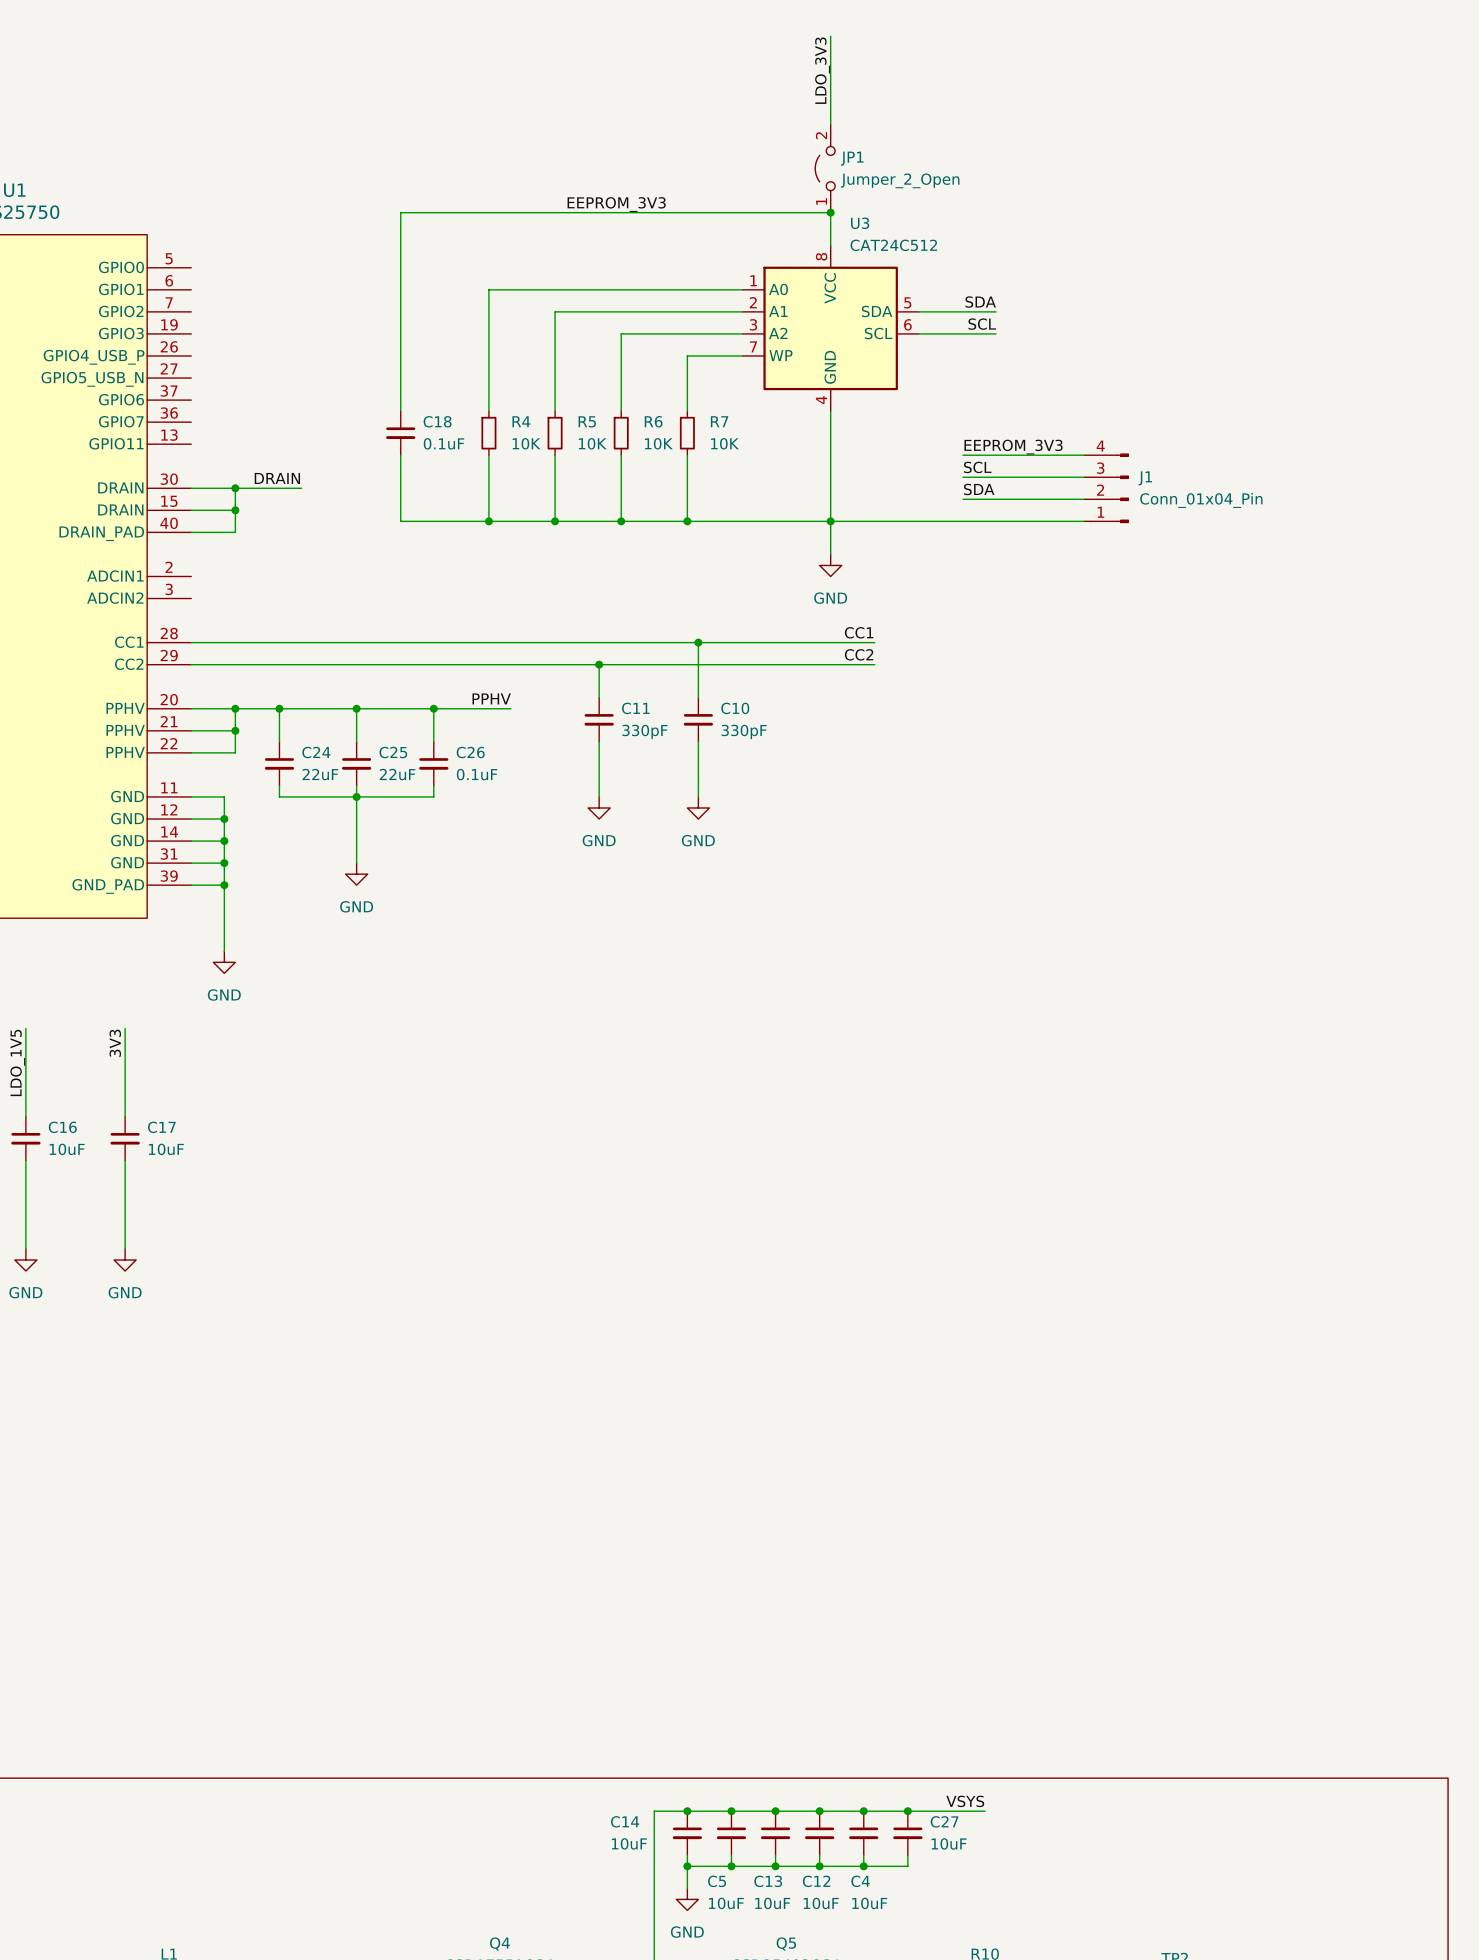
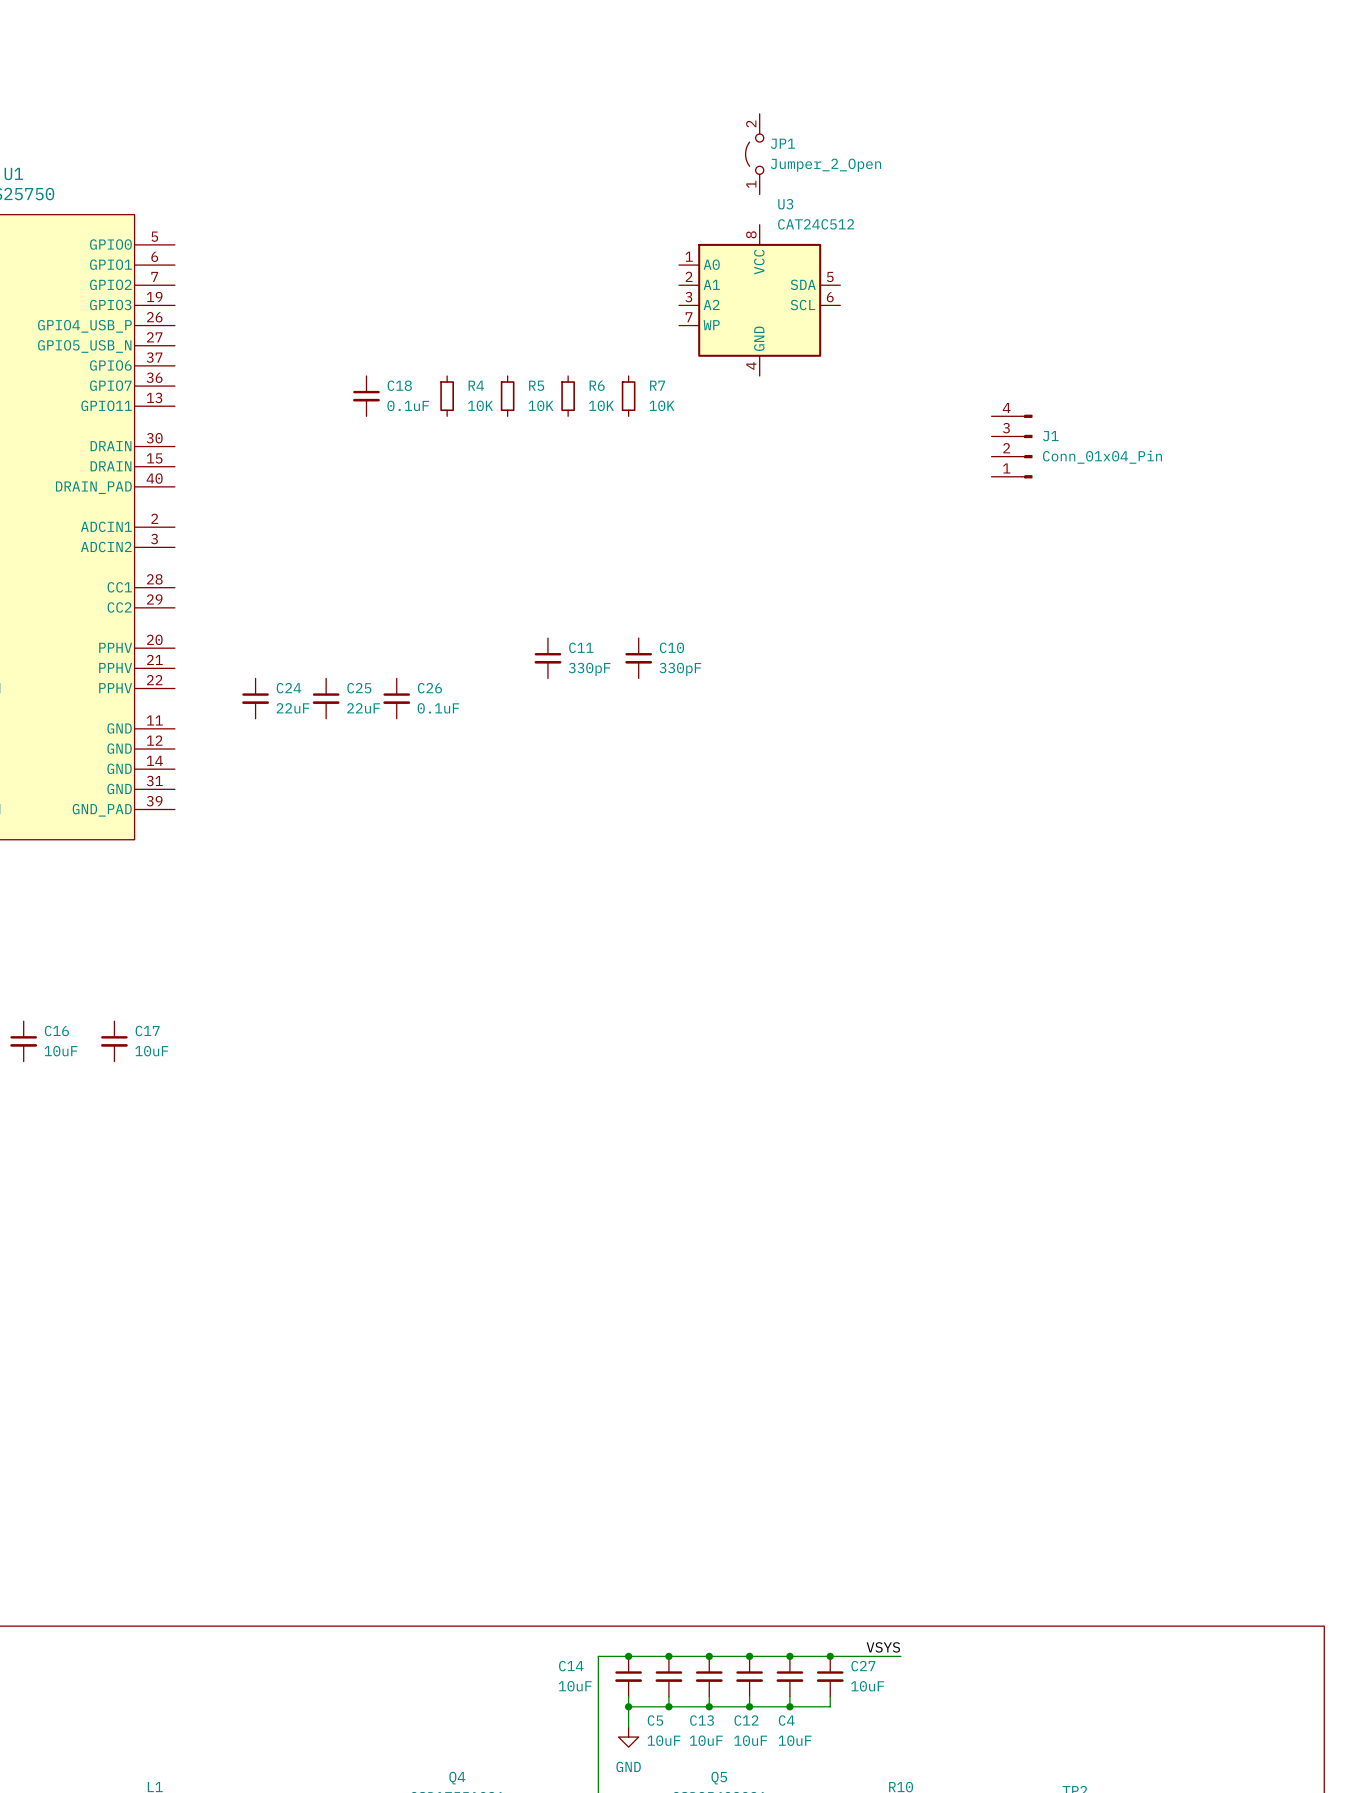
wire: (830, 36) (830, 124) -> none
label: LDO_3V3 (822, 70) -> none
label: EEPROM_3V3 (616, 204) -> none
junction: (830, 212) -> none
wire: (830, 245) (830, 212) (400, 212) (400, 411) -> none
wire: (742, 289) (488, 289) (488, 411) -> none
label: SDA (980, 302) -> none
wire: (742, 311) (555, 311) (555, 411) -> none
wire: (918, 311) (996, 311) -> none
label: SCL (982, 324) -> none
wire: (742, 333) (621, 333) (621, 411) -> none
wire: (918, 333) (996, 333) -> none
wire: (742, 355) (687, 355) (687, 411) -> none
wire: (830, 411) (830, 554) -> none
label: EEPROM_3V3 (1013, 447) -> none
wire: (400, 455) (400, 521) (1084, 521) -> none
wire: (488, 455) (488, 521) -> none
wire: (555, 455) (555, 521) -> none
wire: (621, 455) (621, 521) -> none
wire: (687, 455) (687, 521) -> none
wire: (962, 455) (1084, 455) -> none
label: SCL (977, 467) -> none
wire: (962, 477) (1084, 477) -> none
label: DRAIN (277, 478) -> none
wire: (191, 488) (301, 488) -> none
wire: (235, 488) (235, 532) (191, 532) -> none
junction: (235, 488) -> none
label: SDA (979, 489) -> none
wire: (962, 499) (1084, 499) -> none
wire: (191, 510) (235, 510) -> none
junction: (235, 510) -> none
junction: (488, 521) -> none
junction: (555, 521) -> none
junction: (621, 521) -> none
junction: (687, 521) -> none
junction: (830, 521) -> none
power symbol: GND (830, 565) -> none
label: CC1 (859, 632) -> none
wire: (191, 642) (874, 642) -> none
wire: (698, 642) (698, 697) -> none
junction: (698, 642) -> none
label: CC2 (859, 654) -> none
wire: (191, 664) (874, 664) -> none
wire: (599, 664) (599, 697) -> none
junction: (599, 664) -> none
label: PPHV (491, 698) -> none
wire: (191, 708) (510, 708) -> none
wire: (235, 708) (235, 752) (191, 752) -> none
junction: (235, 708) -> none
wire: (279, 708) (279, 741) -> none
junction: (279, 708) -> none
wire: (356, 708) (356, 741) -> none
junction: (356, 708) -> none
wire: (433, 708) (433, 741) -> none
junction: (433, 708) -> none
wire: (191, 730) (235, 730) -> none
junction: (235, 730) -> none
wire: (599, 741) (599, 796) -> none
wire: (698, 741) (698, 796) -> none
wire: (279, 785) (279, 796) (433, 796) (433, 785) -> none
wire: (356, 785) (356, 863) -> none
wire: (191, 796) (224, 796) (224, 951) -> none
junction: (356, 796) -> none
power symbol: GND (599, 807) -> none
power symbol: GND (698, 807) -> none
wire: (191, 819) (224, 819) -> none
junction: (224, 819) -> none
wire: (191, 841) (224, 841) -> none
junction: (224, 841) -> none
wire: (191, 863) (224, 863) -> none
junction: (224, 863) -> none
power symbol: GND (356, 874) -> none
wire: (191, 885) (224, 885) -> none
junction: (224, 885) -> none
power symbol: GND (224, 962) -> none
wire: (25, 1028) (25, 1116) -> none
wire: (125, 1028) (125, 1116) -> none
label: 3V3 (115, 1043) -> none
label: LDO_1V5 (17, 1062) -> none
wire: (25, 1160) (25, 1248) -> none
wire: (125, 1160) (125, 1248) -> none
power symbol: GND (25, 1259) -> none
power symbol: GND (125, 1259) -> none

